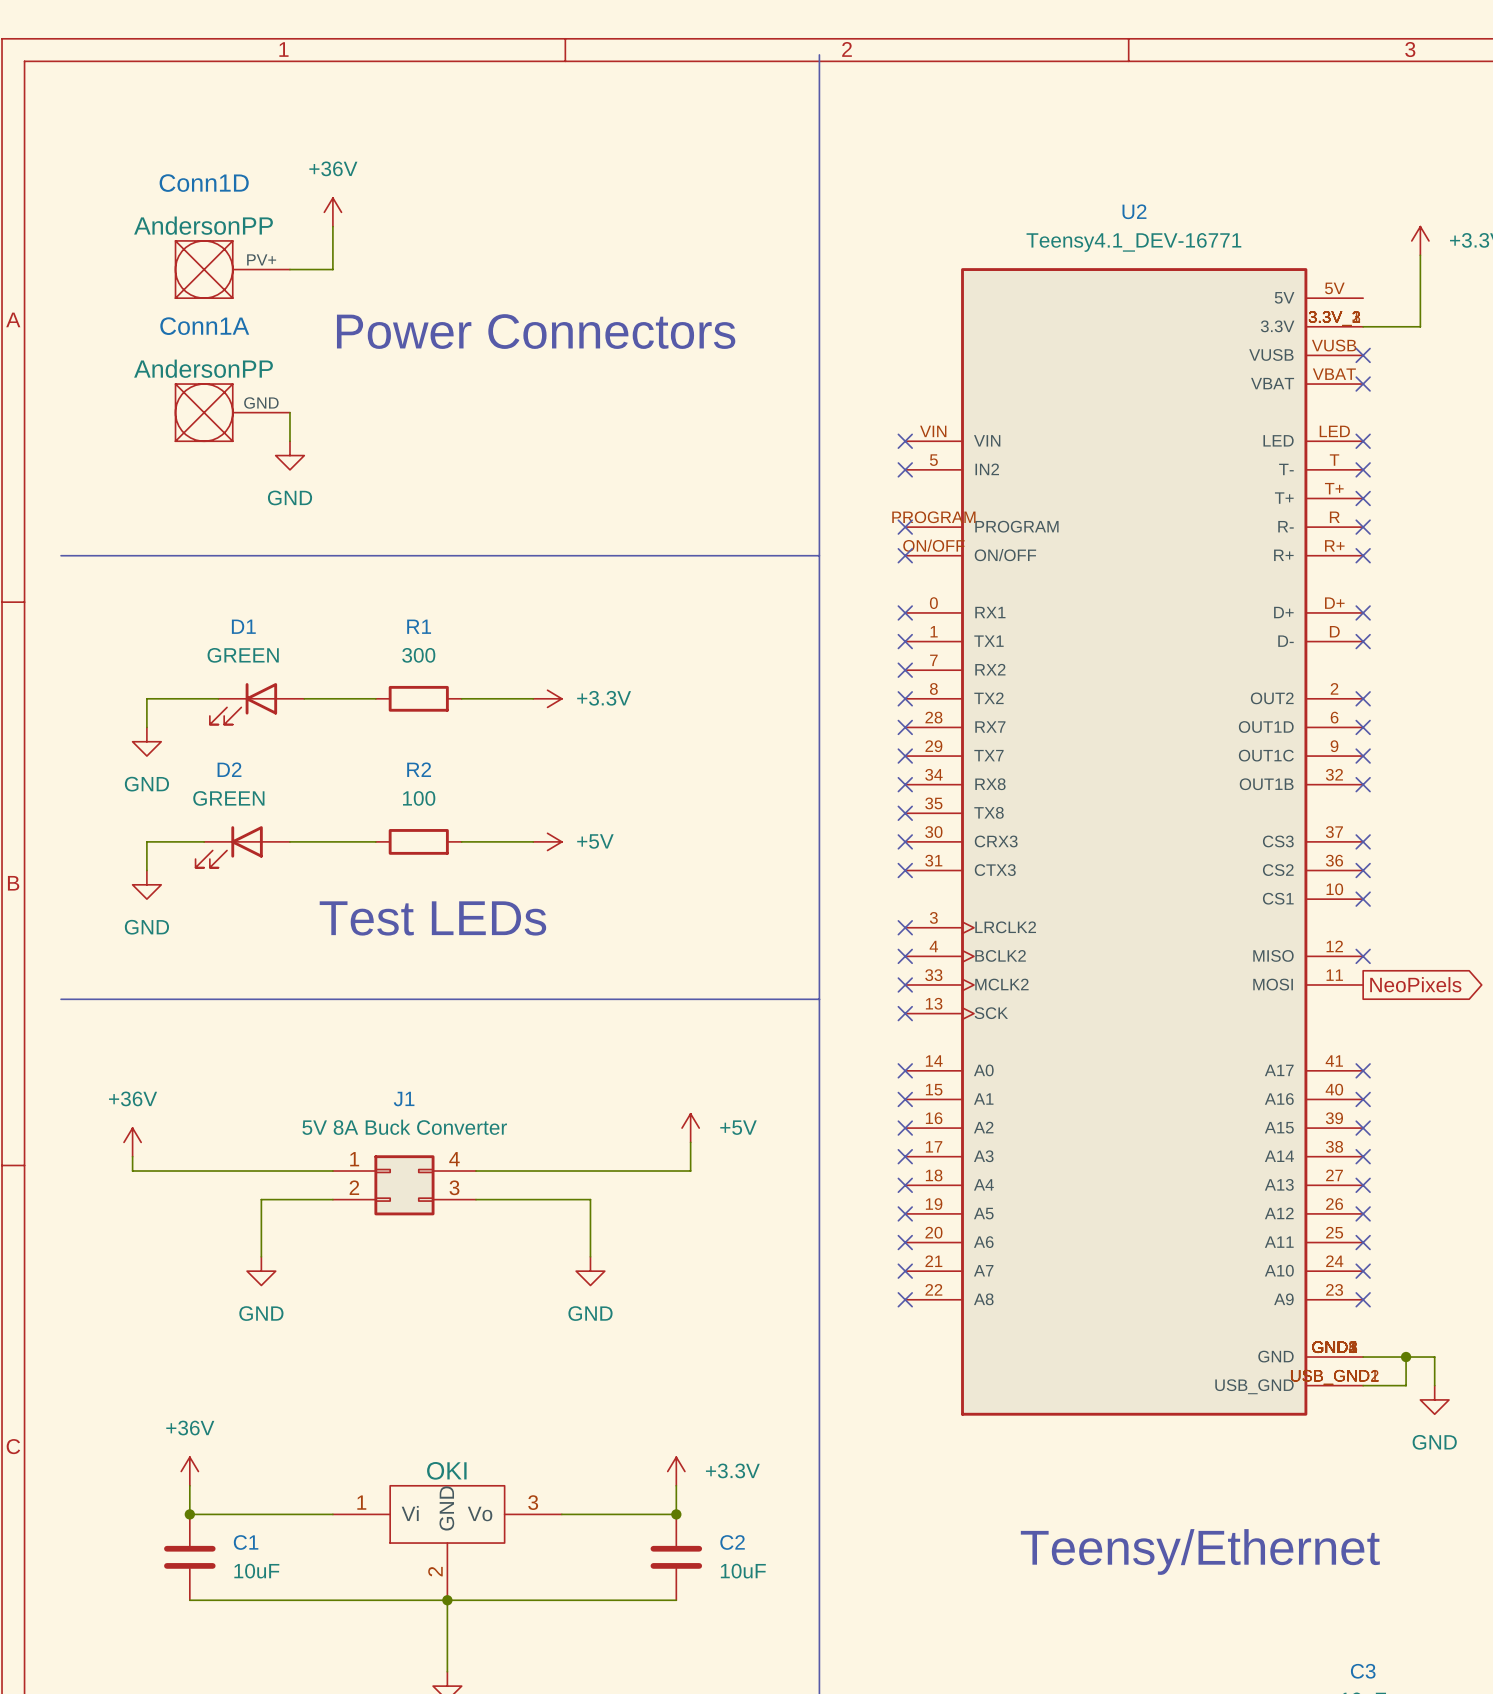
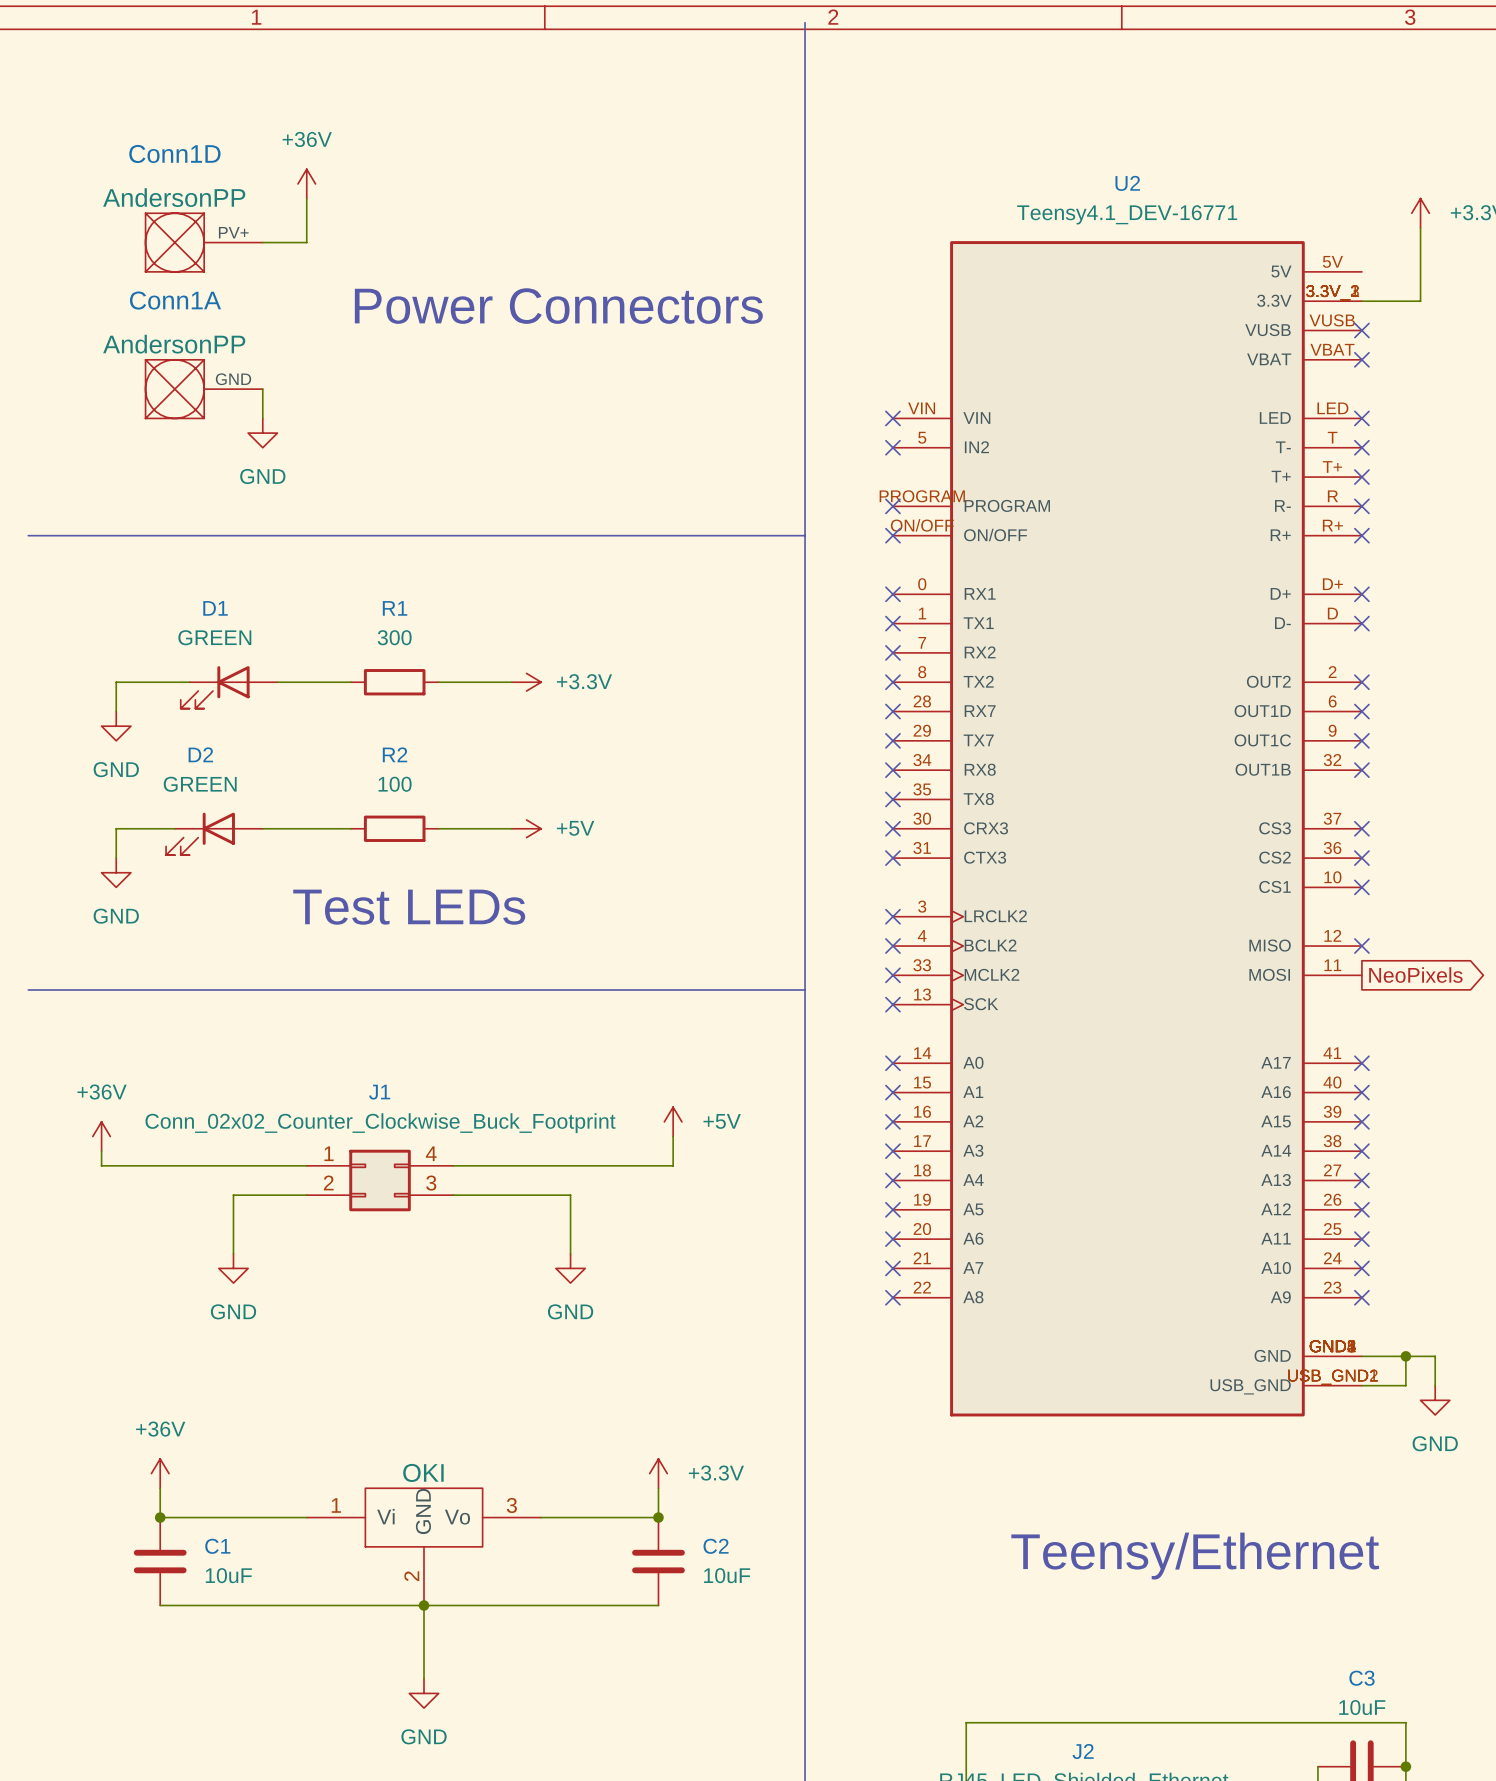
text position: Power Connectors (536, 331) -> Power Connectors (558, 306)
J1 value: 5V 8A Buck Converter (404, 1127) -> Conn_02x02_Counter_Clockwise_Buck_Footprint (380, 1123)

